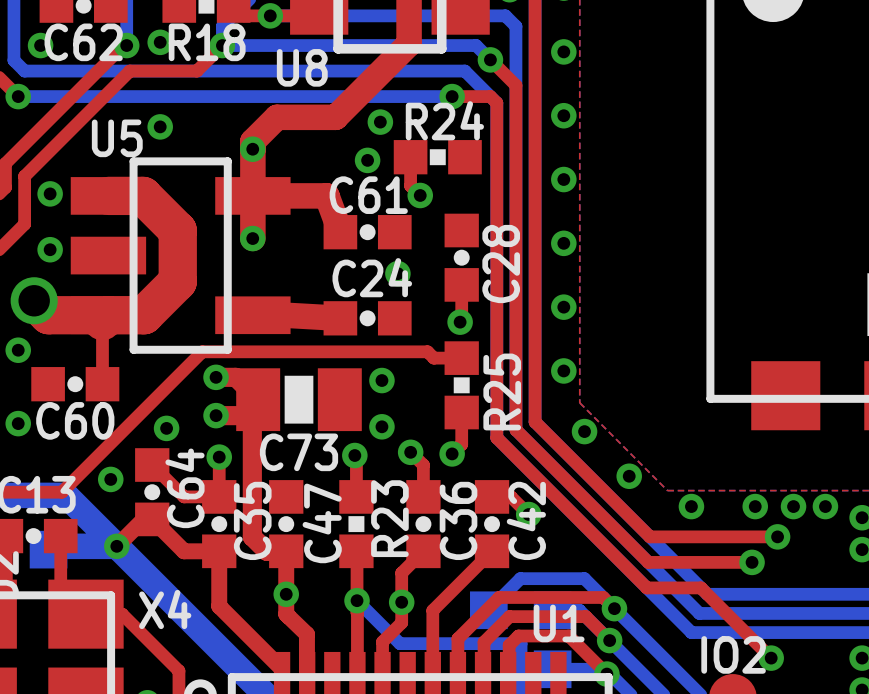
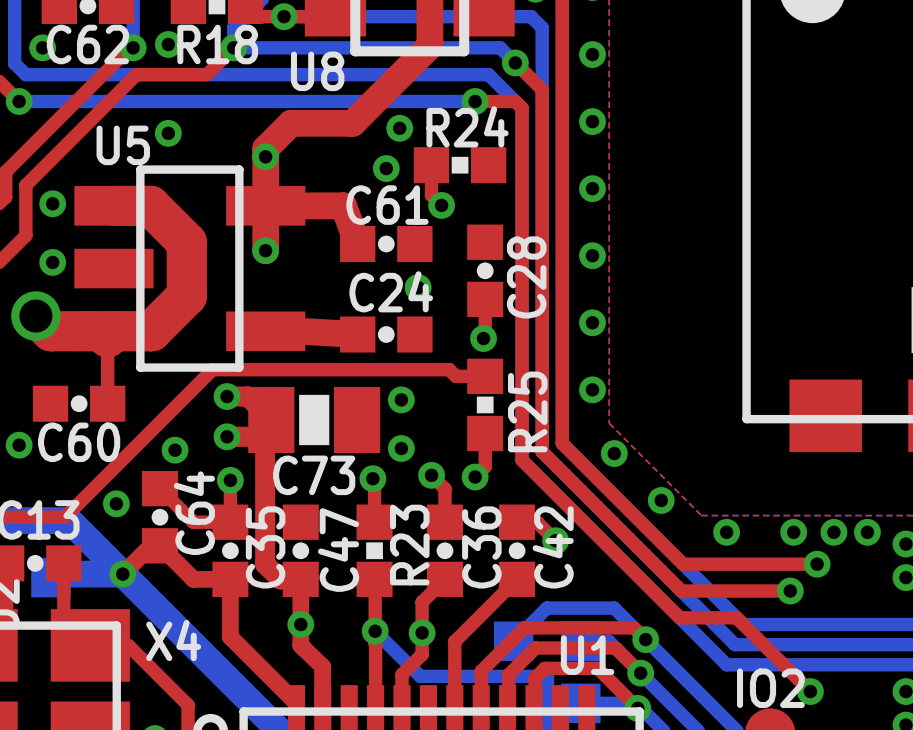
via: (18, 350) -> none

